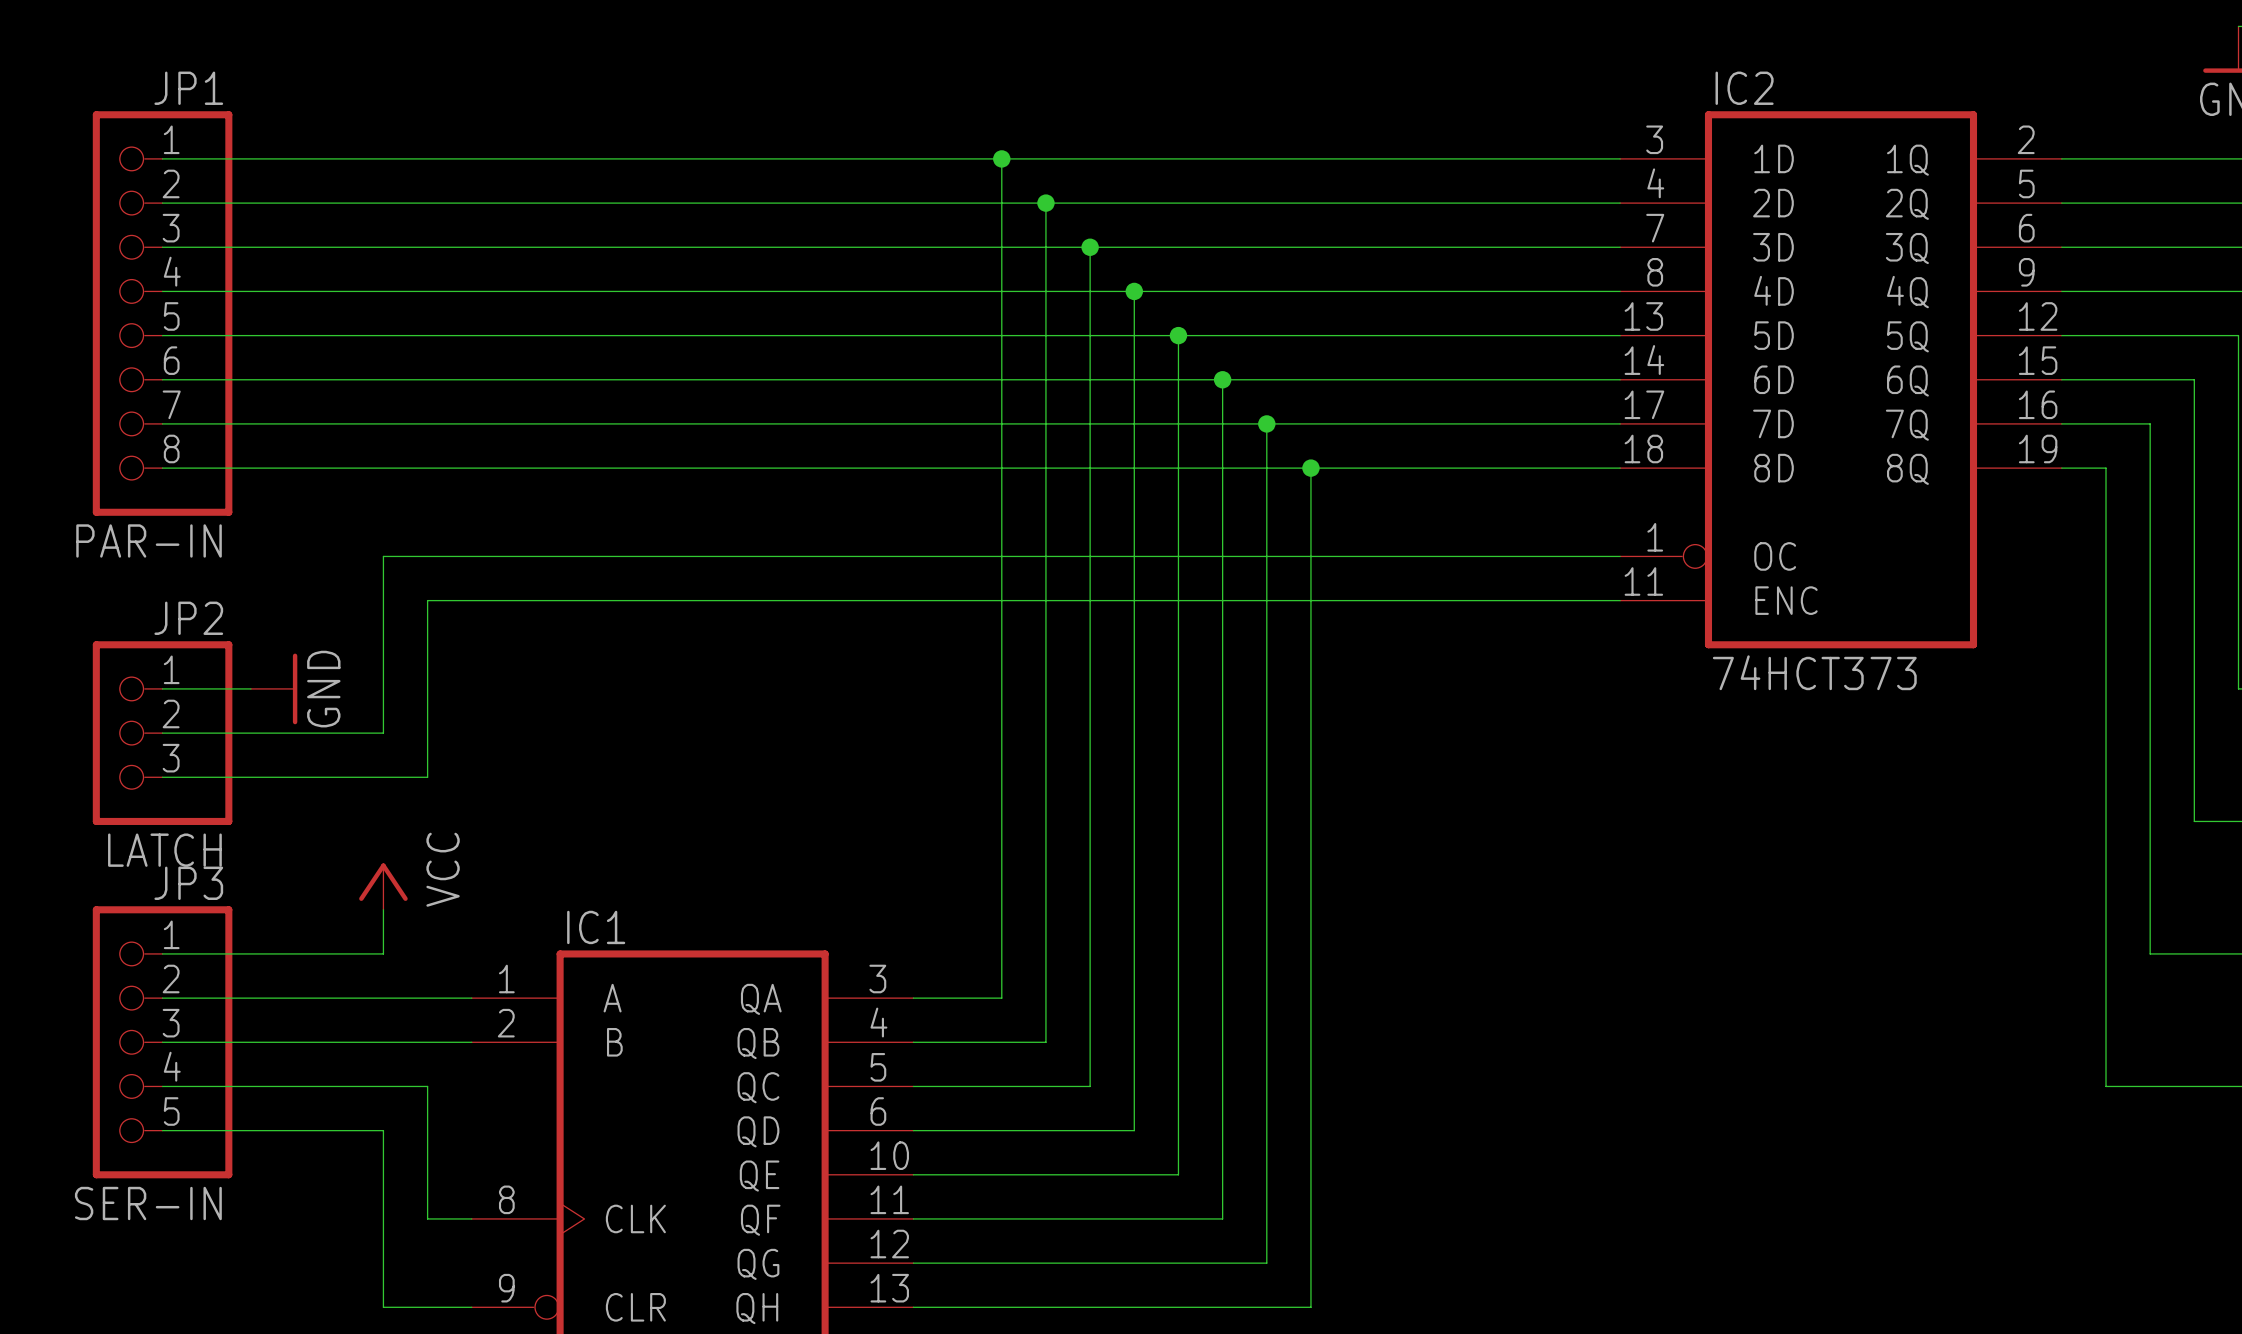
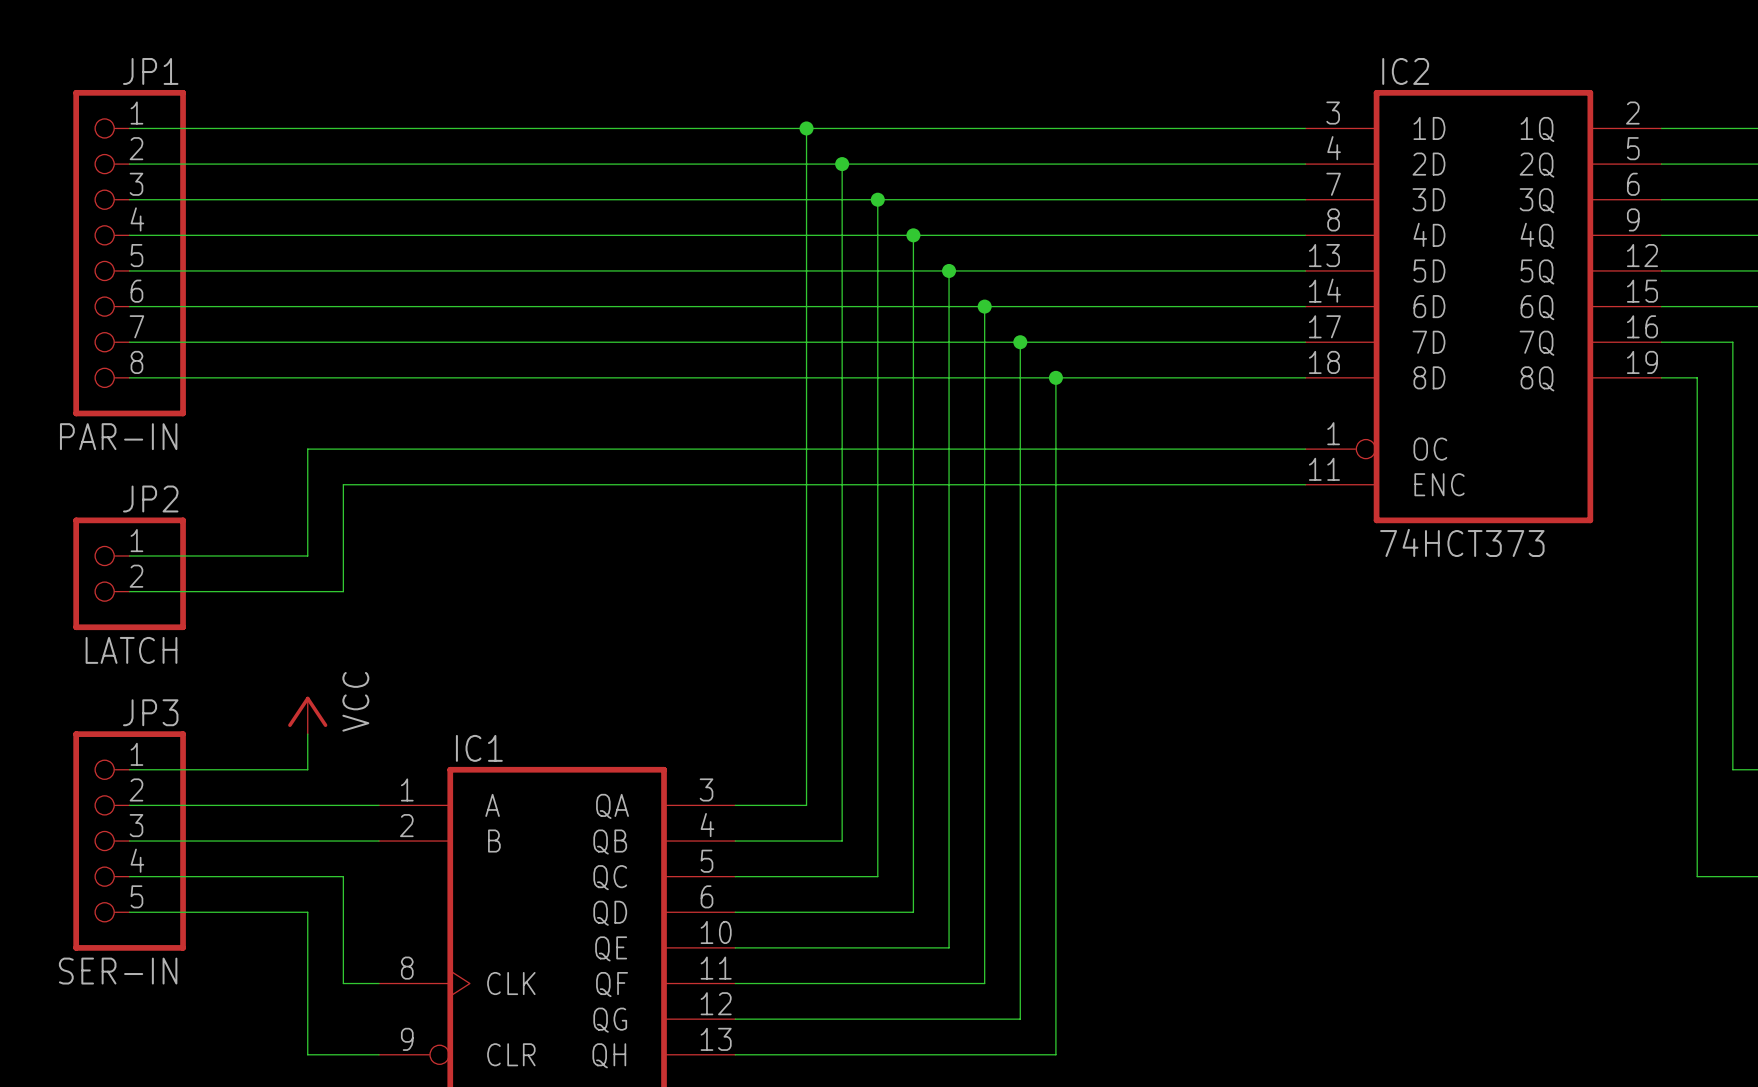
JP2 symbol: [92, 641, 233, 825] -> [73, 517, 186, 631]
wire: none -> (200, 555) (307, 555)
power symbol: GND (274, 688) -> none
wire: (383, 688) (383, 733) -> (343, 591) (307, 591)
wire: (427, 733) (427, 777) (162, 777) -> none

